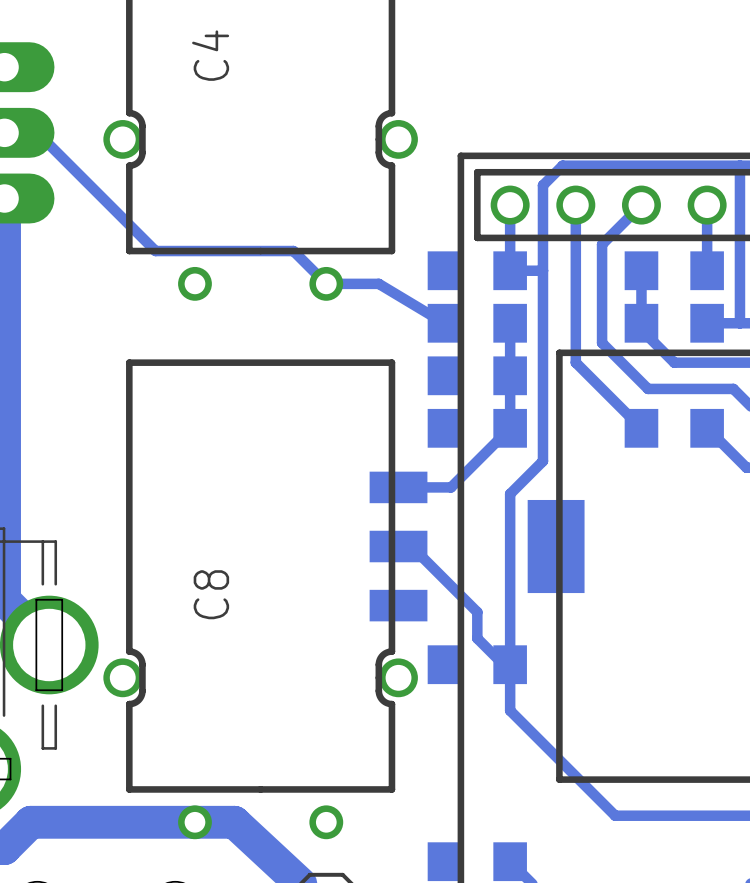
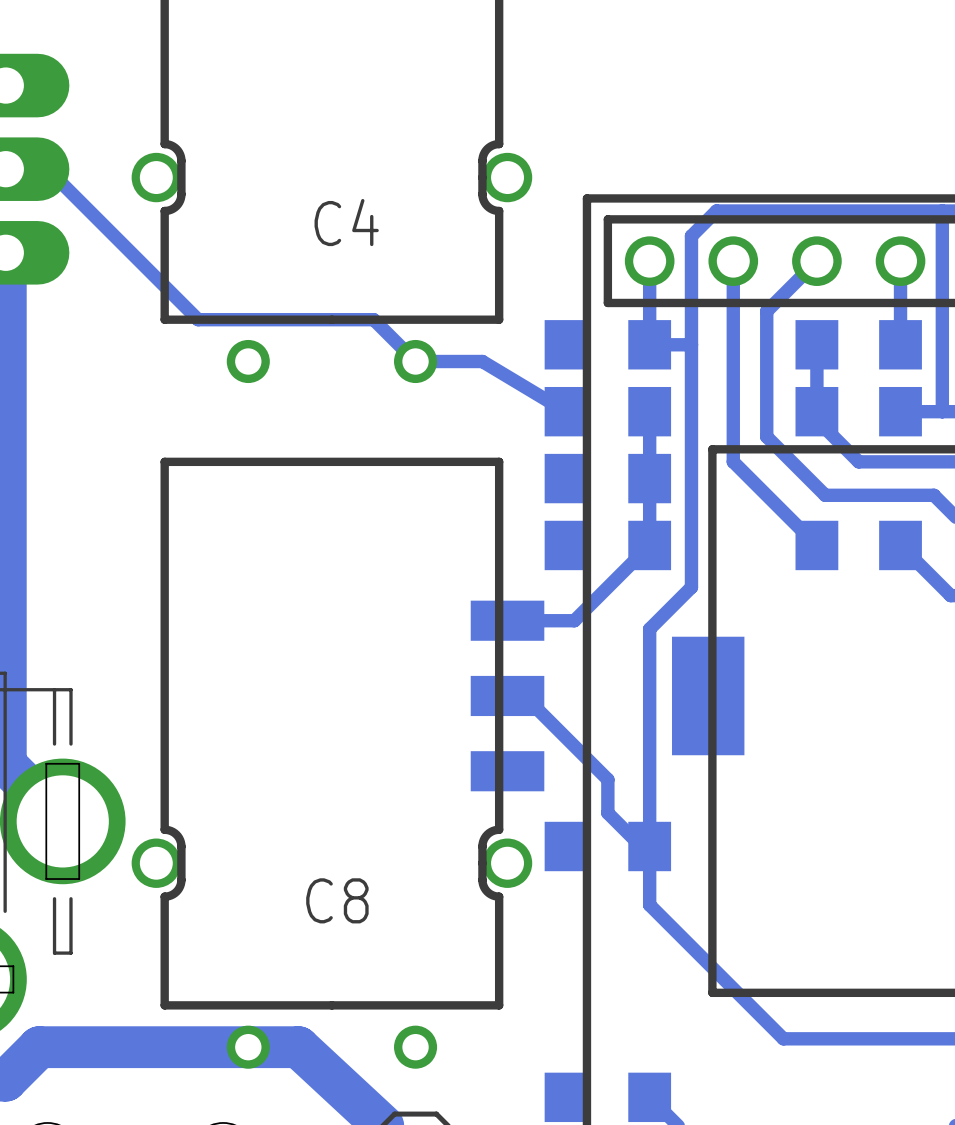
C4 name rotation: 0° (210, 55) -> 90° clockwise (346, 222)
C4 name position: C4 (210, 55) -> C4 (346, 222)
C8 name rotation: 0° (211, 594) -> 90° clockwise (337, 900)
C8 name position: C8 (211, 594) -> C8 (337, 900)

